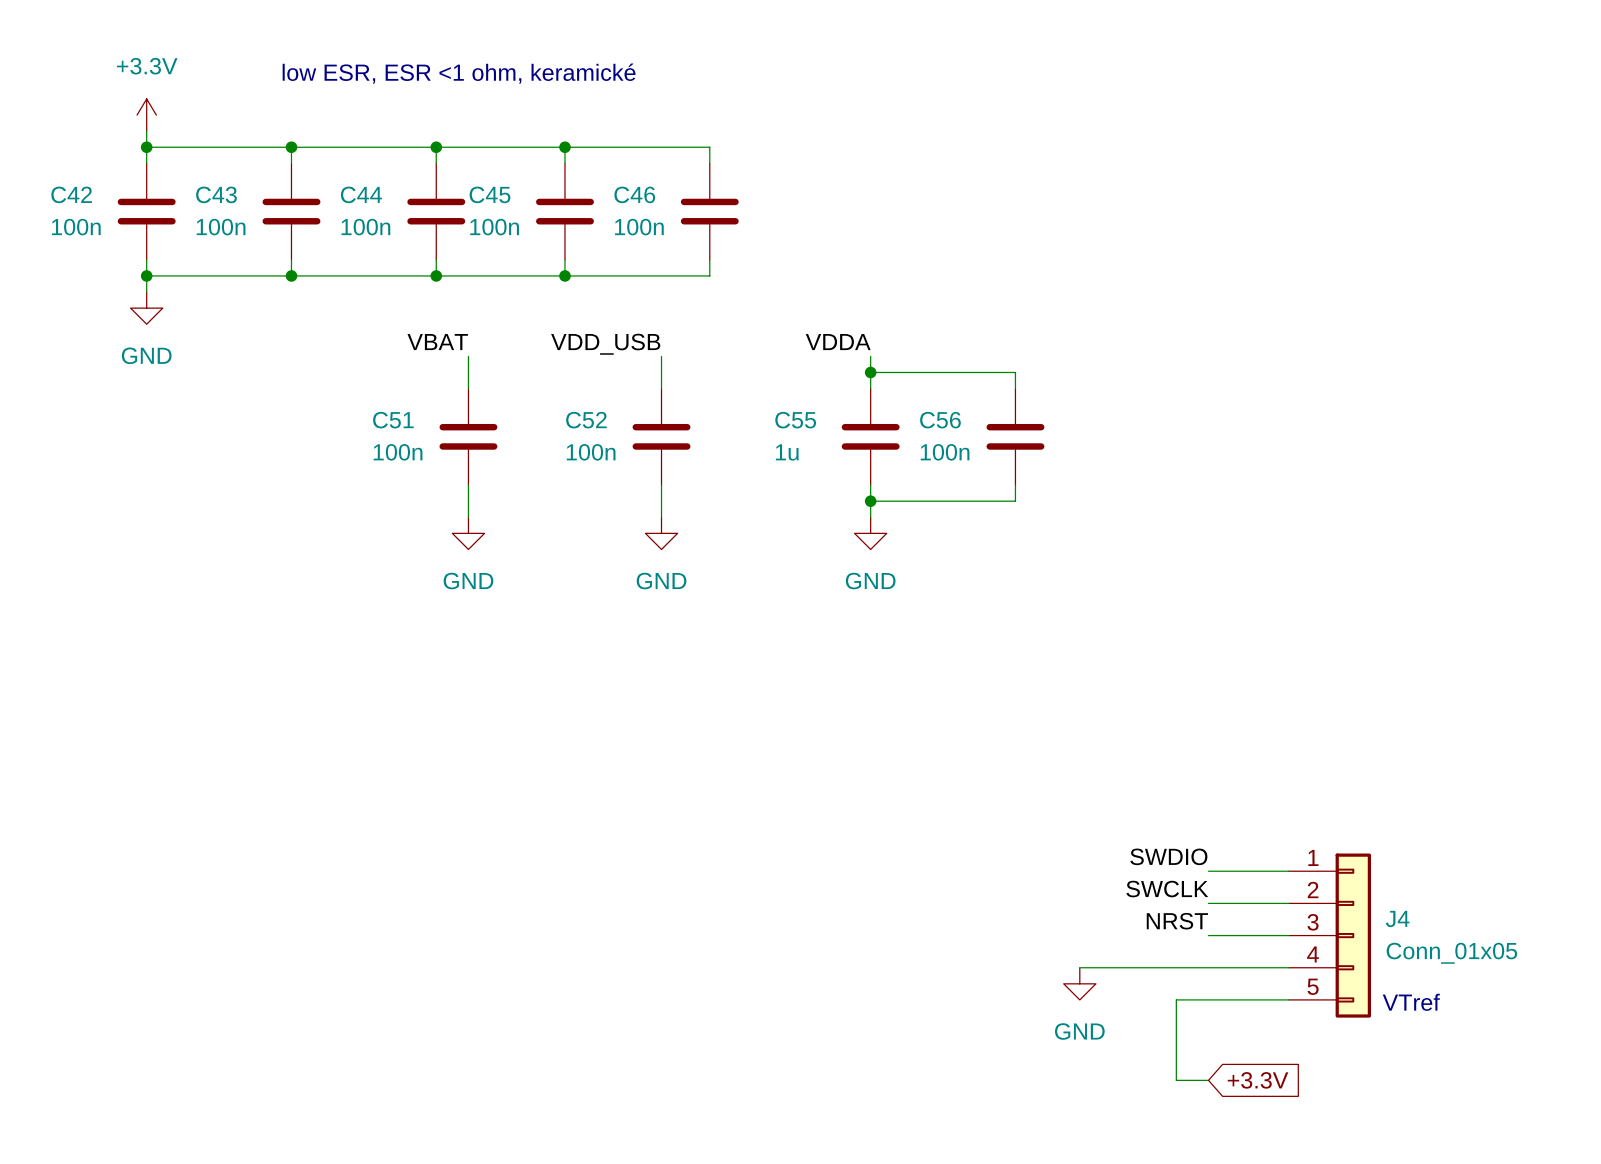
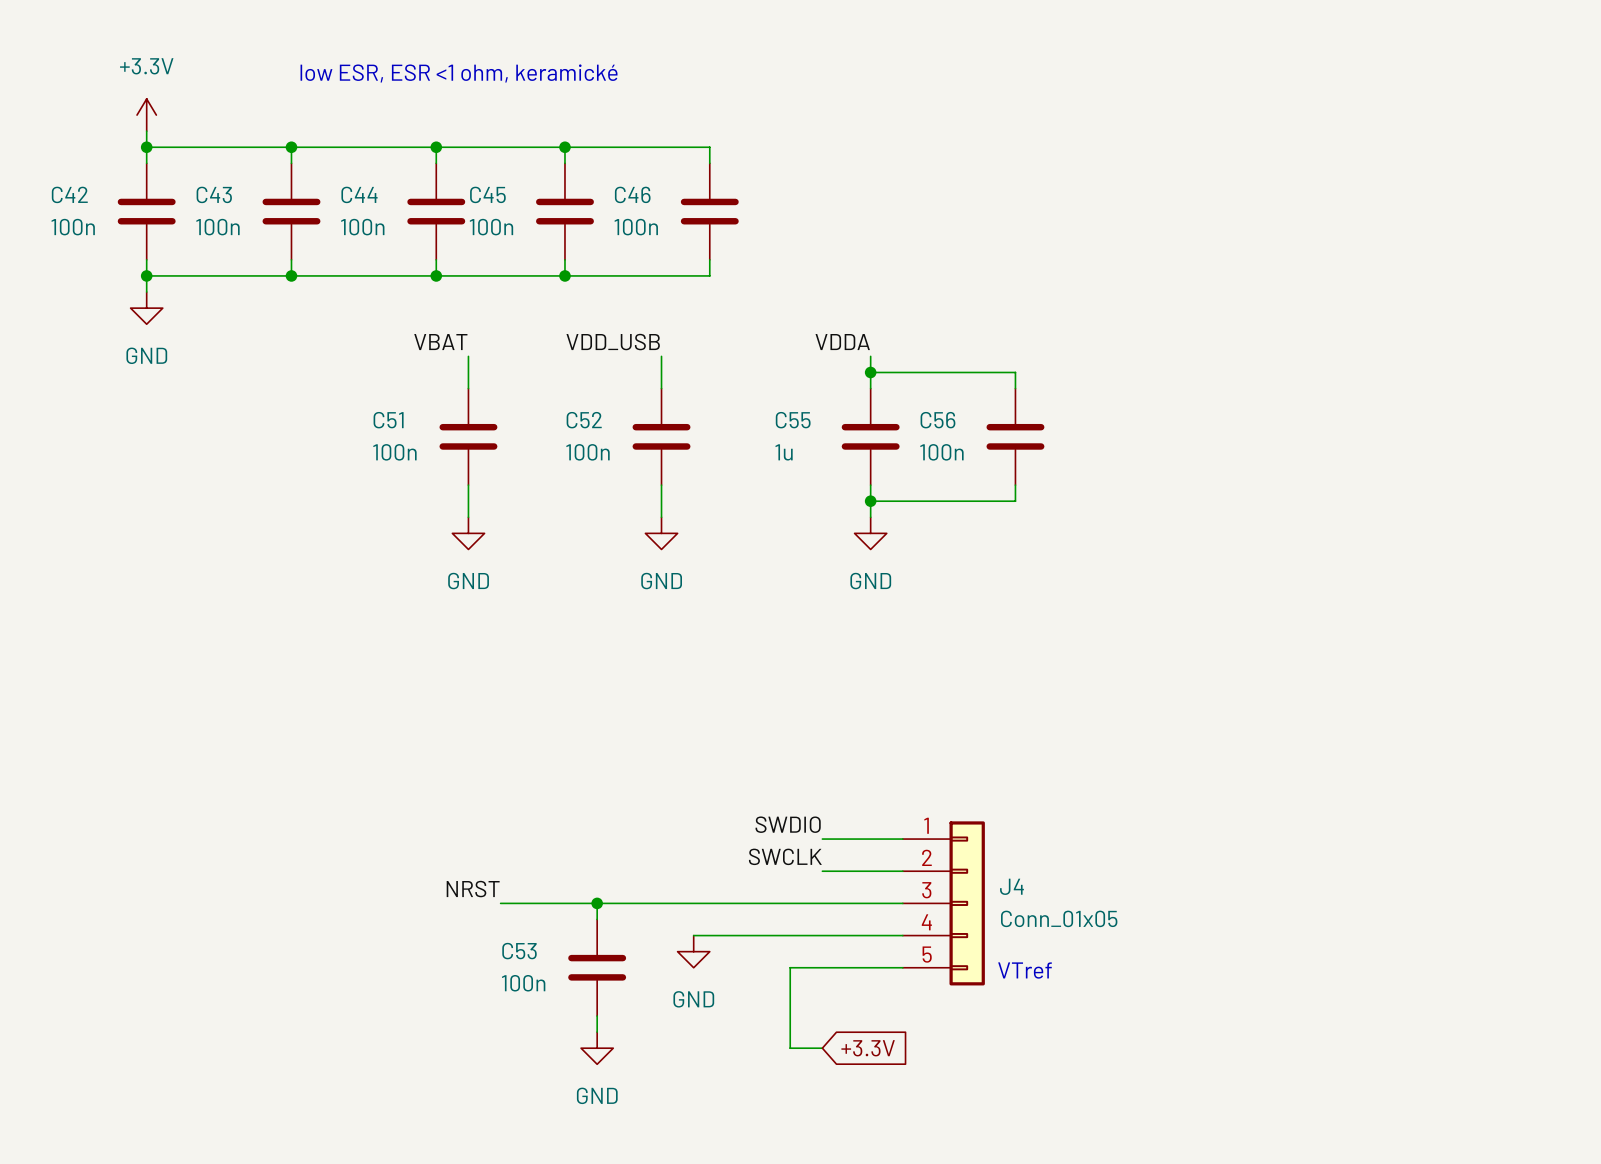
label: none -> SWDIO (788, 824)
wire: none -> (822, 839) (902, 839)
label: none -> SWCLK (785, 856)
label: SWDIO (1168, 856) -> none
wire: none -> (822, 871) (902, 871)
wire: (1208, 871) (1288, 871) -> none
label: none -> NRST (473, 889)
label: SWCLK (1167, 889) -> none
wire: none -> (500, 903) (902, 903)
wire: none -> (597, 903) (597, 919)
junction: none -> (597, 903)
wire: (1208, 903) (1288, 903) -> none
label: NRST (1177, 921) -> none
wire: none -> (693, 935) (902, 935)
wire: (1208, 935) (1288, 935) -> none
J4 position: (1329, 935) -> (943, 903)
power symbol: none -> GND (693, 951)
C53: none -> 100n (597, 967)
wire: none -> (902, 967) (790, 967) (790, 1048) (822, 1048)
wire: (1079, 967) (1288, 967) -> none
text: none -> VTref (1025, 970)
power symbol: GND (1079, 983) -> none
wire: (1288, 999) (1176, 999) (1176, 1080) (1208, 1080) -> none
text: VTref (1411, 1002) -> none
wire: none -> (597, 1016) (597, 1032)
power symbol: none -> GND (597, 1048)
global label: none -> +3.3V (868, 1048)
global label: +3.3V (1258, 1080) -> none

